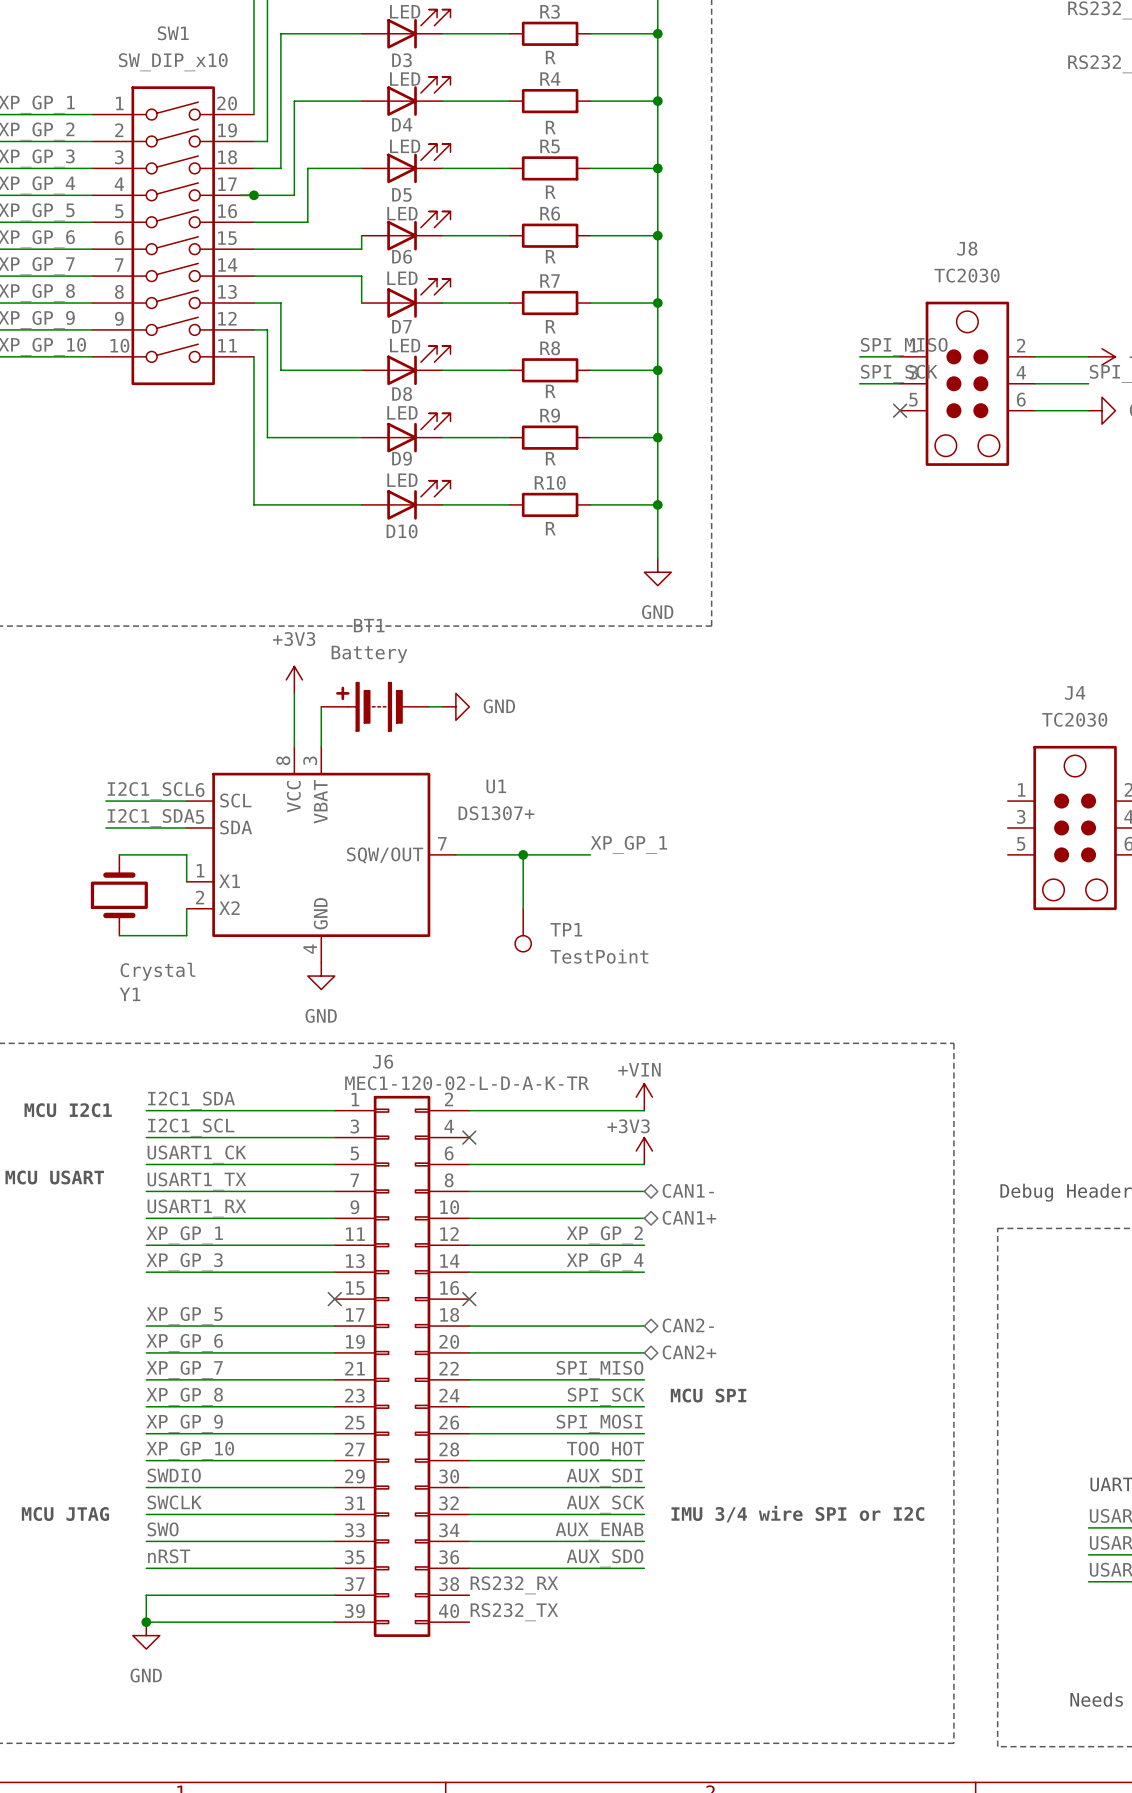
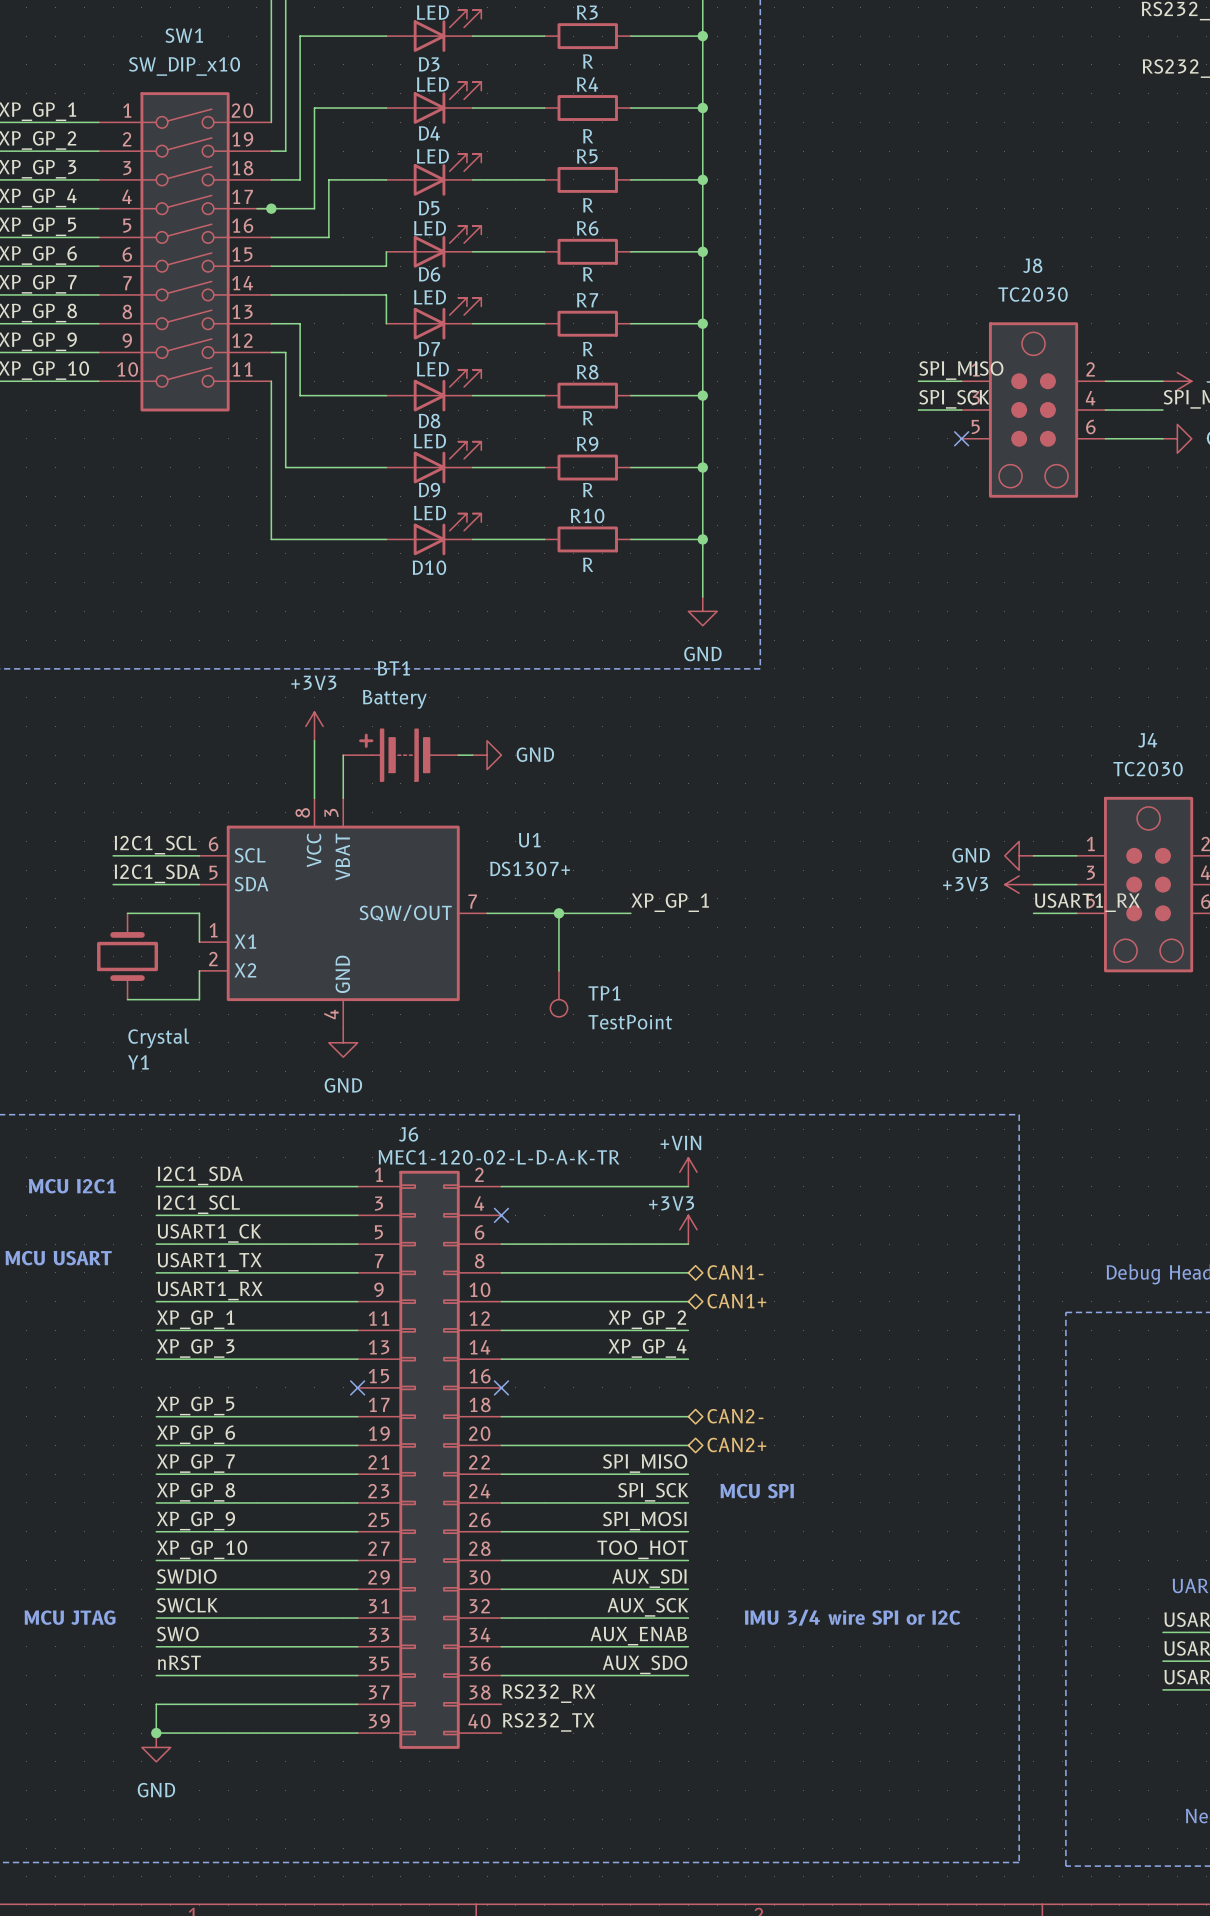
power symbol: none -> GND (1019, 855)
wire: none -> (1033, 855) (1076, 855)
power symbol: none -> +3V3 (1019, 884)
wire: none -> (1033, 884) (1076, 884)
label: none -> USART1_RX (1087, 902)
wire: none -> (1033, 913) (1076, 913)

